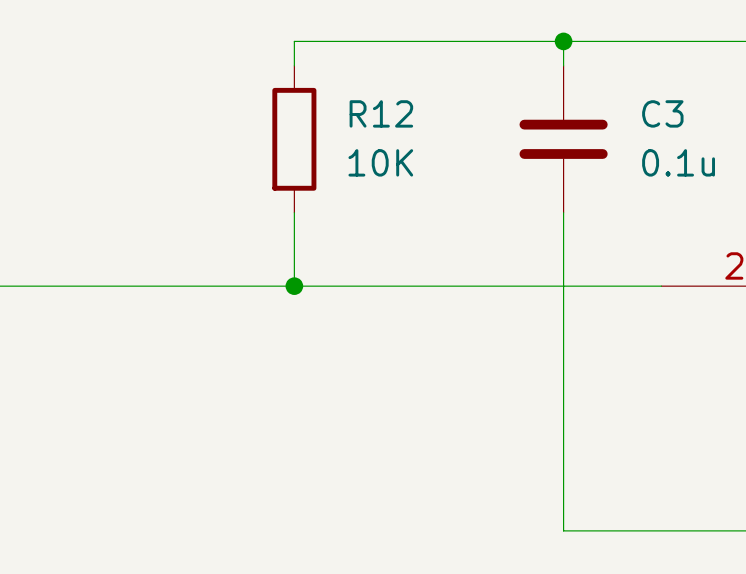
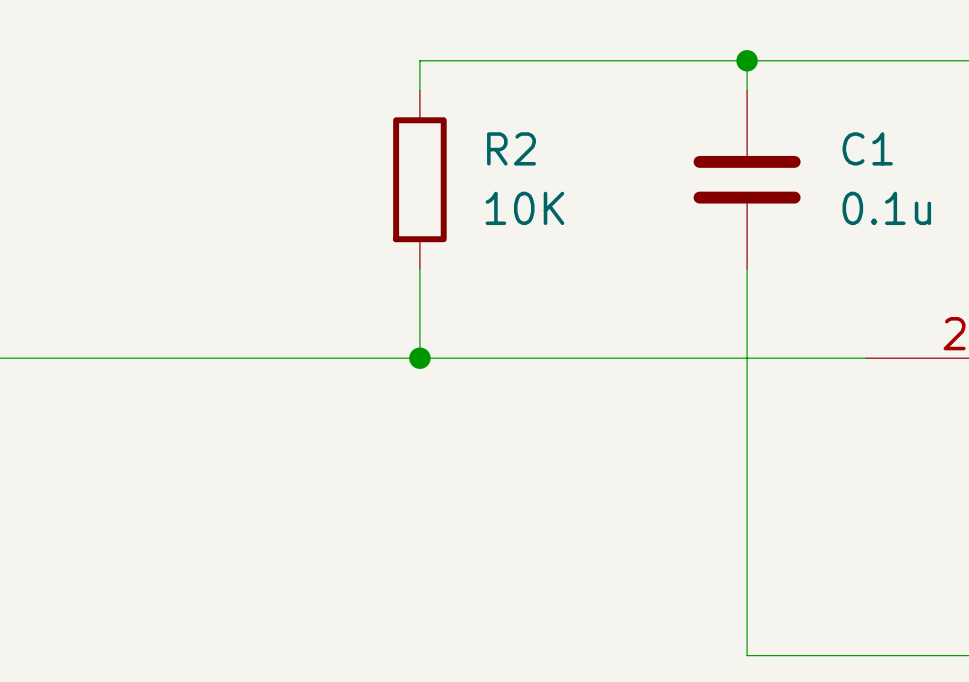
R12 name: R12 (381, 113) -> R2 (511, 148)
C3 name: C3 (662, 113) -> C1 (867, 148)

